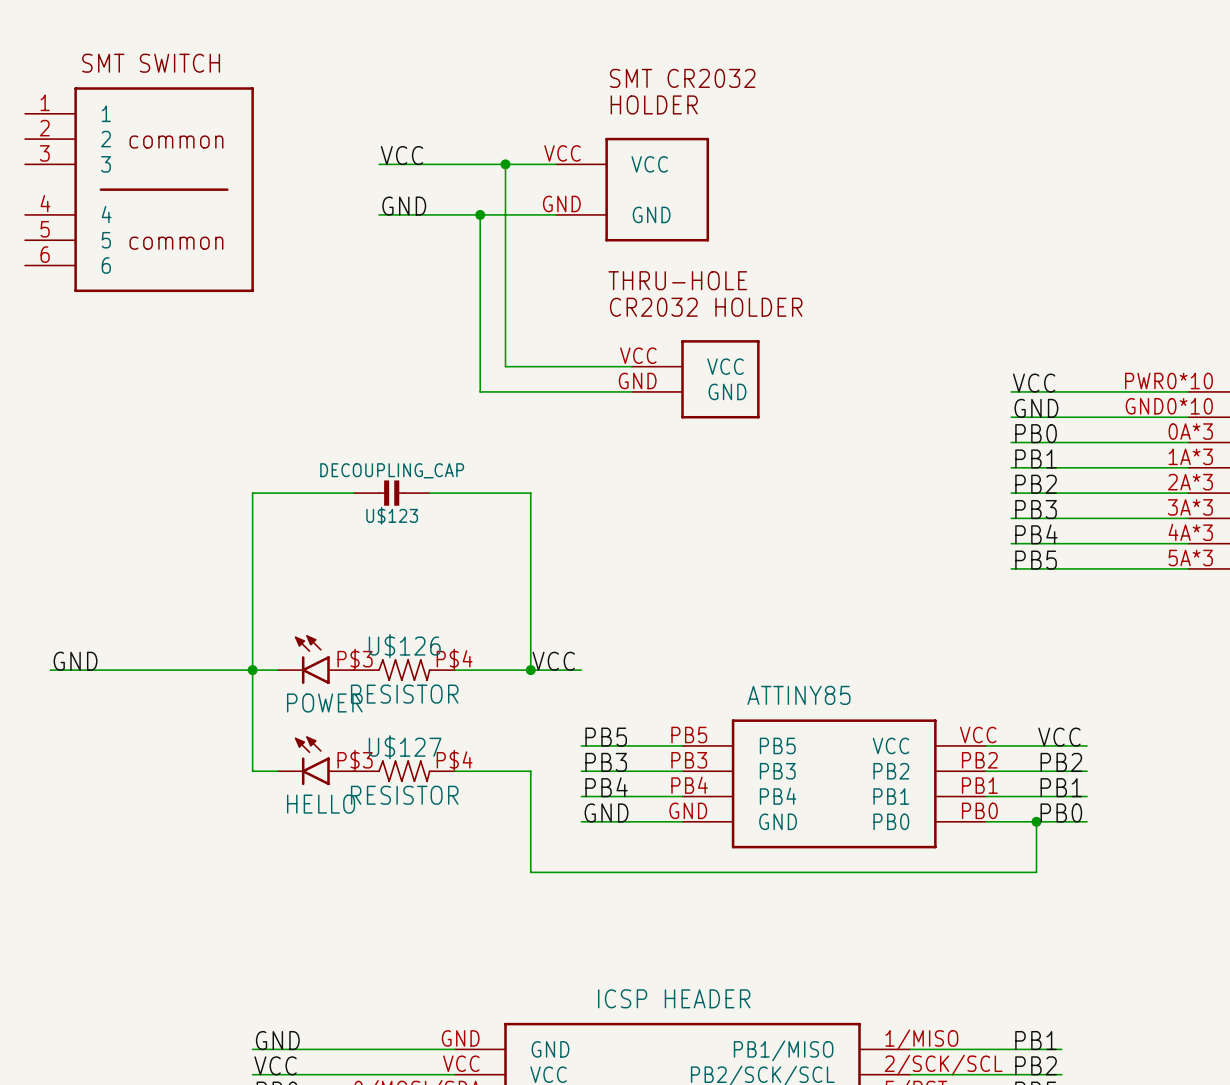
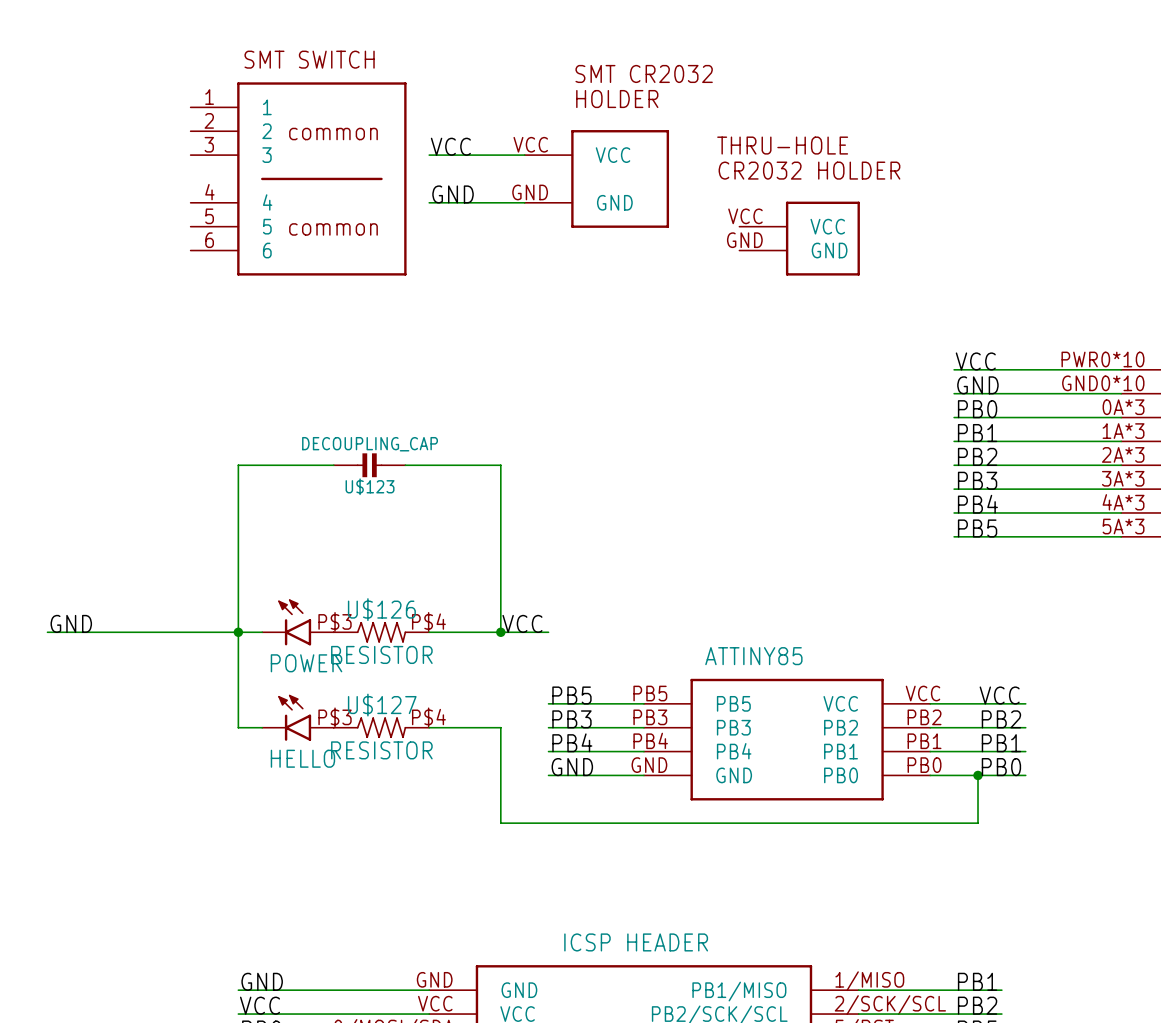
label position: VCC (401, 155) -> VCC (450, 146)
wire: (379, 164) (454, 164) -> none
wire: (505, 164) (505, 366) (631, 366) -> none
junction: (505, 164) -> none
part position: (139, 189) -> (298, 178)
label position: GND (404, 206) -> GND (453, 194)
wire: (379, 214) (454, 214) -> none
wire: (480, 214) (480, 391) (631, 391) -> none
junction: (480, 214) -> none
part position: (695, 379) -> (799, 238)

